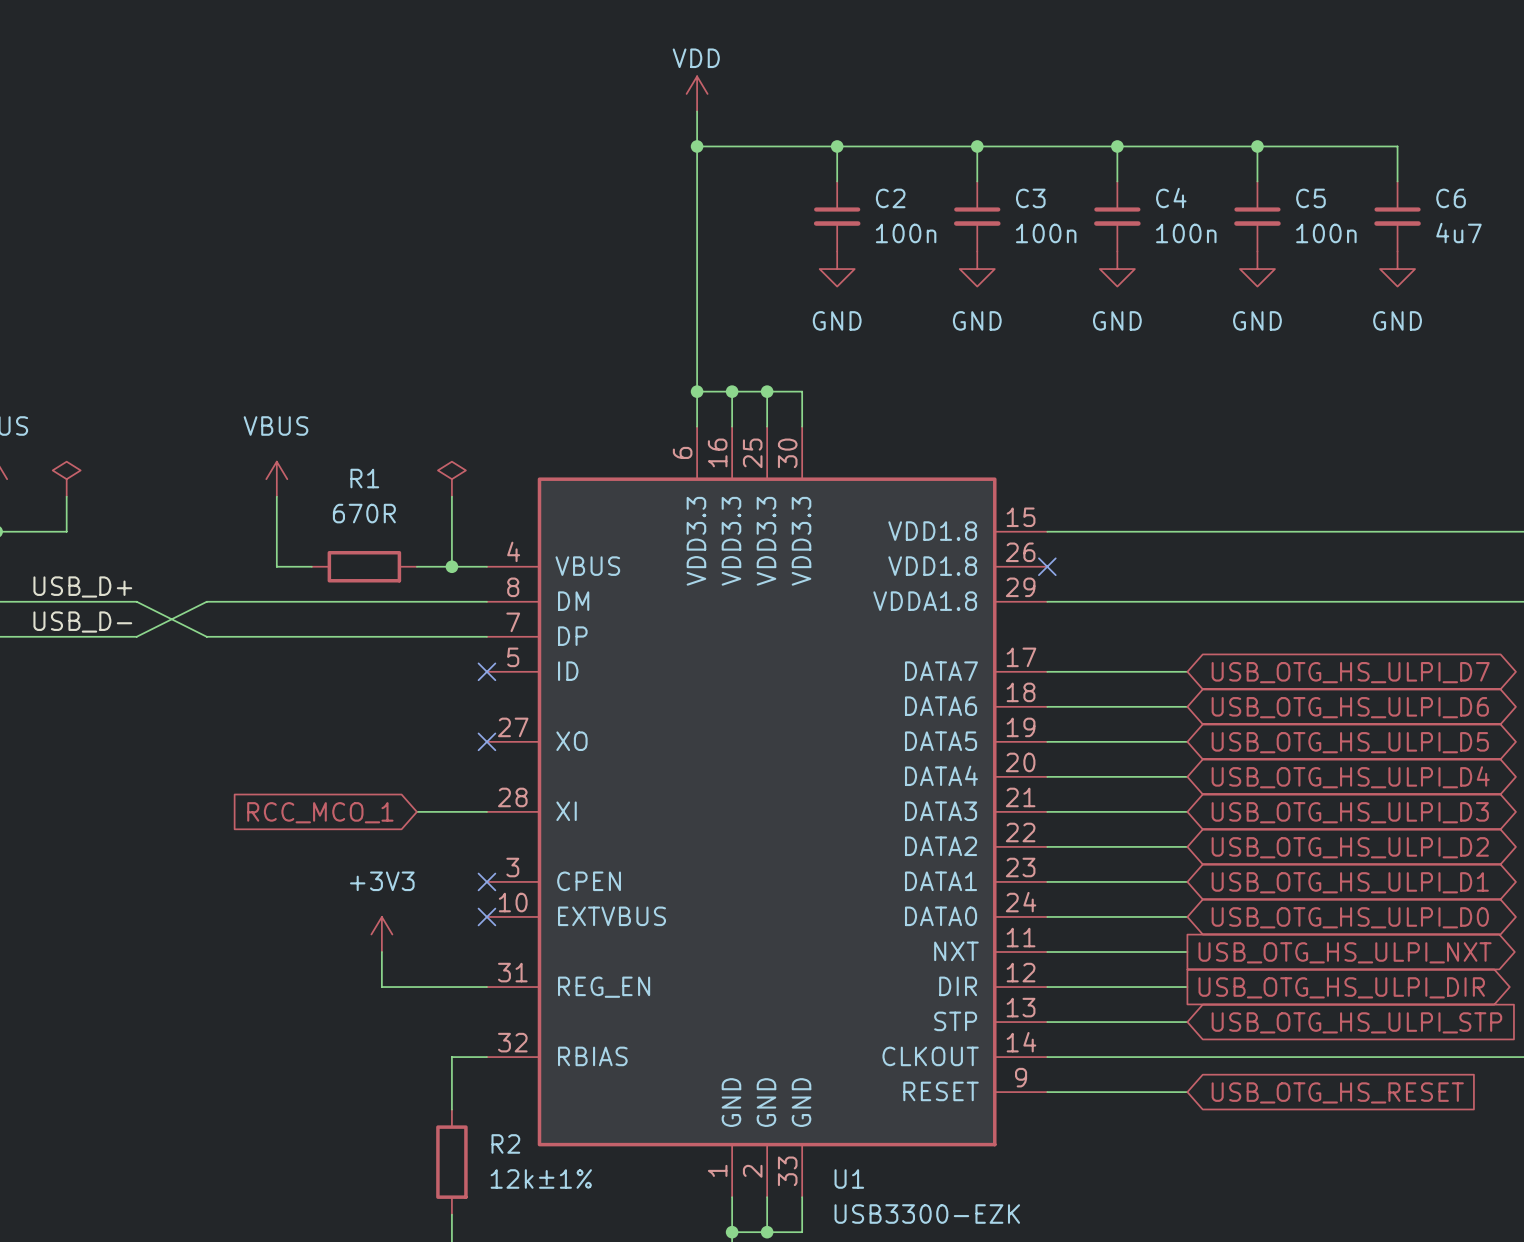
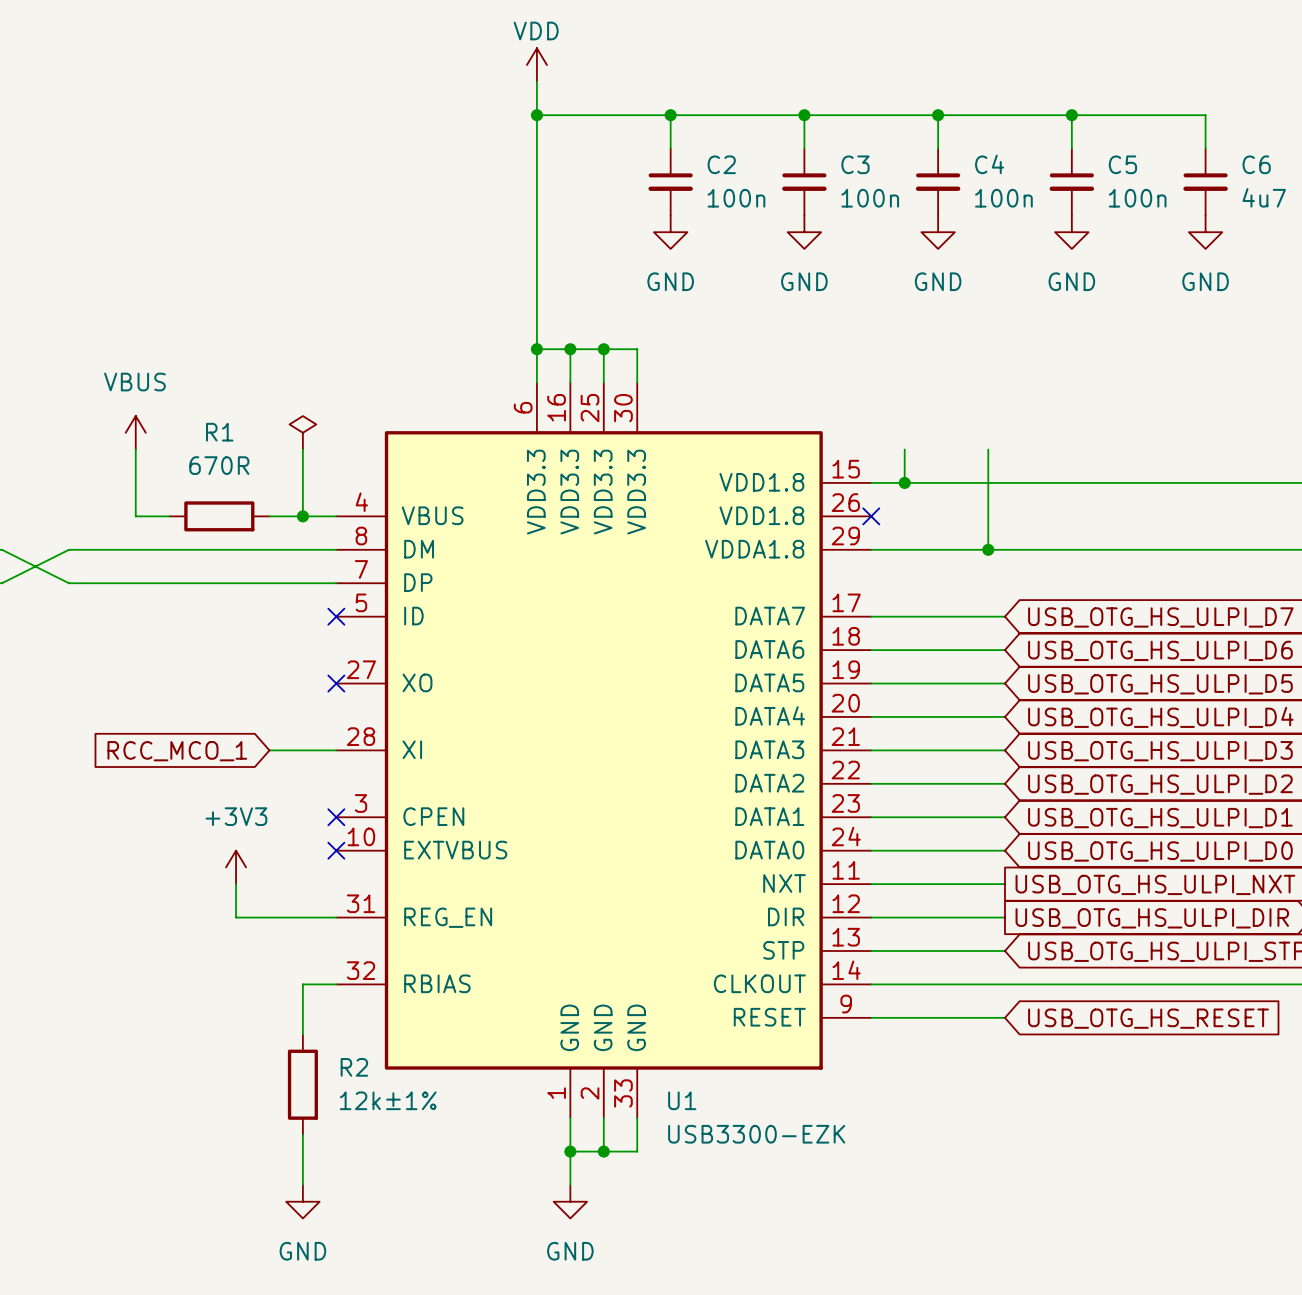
wire: none -> (904, 449) (904, 482)
wire: none -> (988, 449) (988, 549)
junction: none -> (904, 482)
junction: none -> (988, 549)

